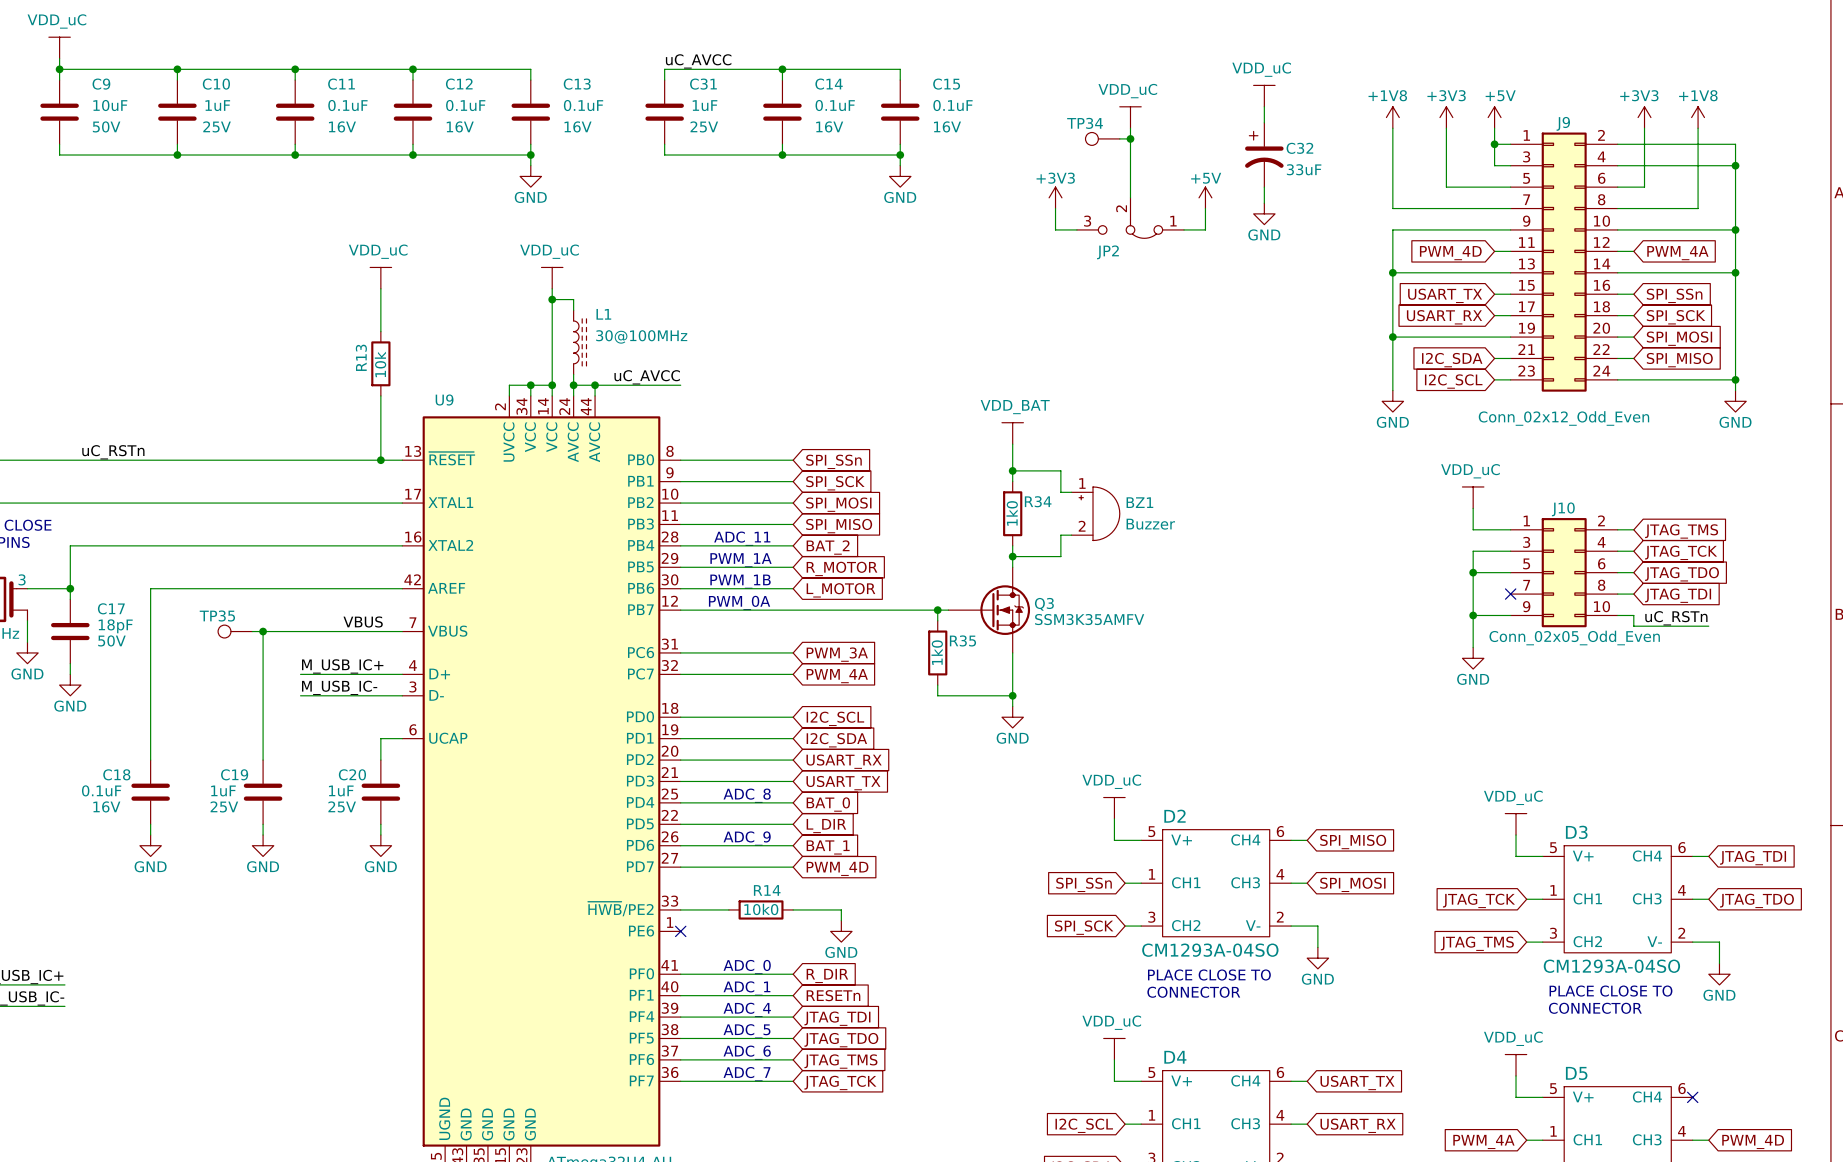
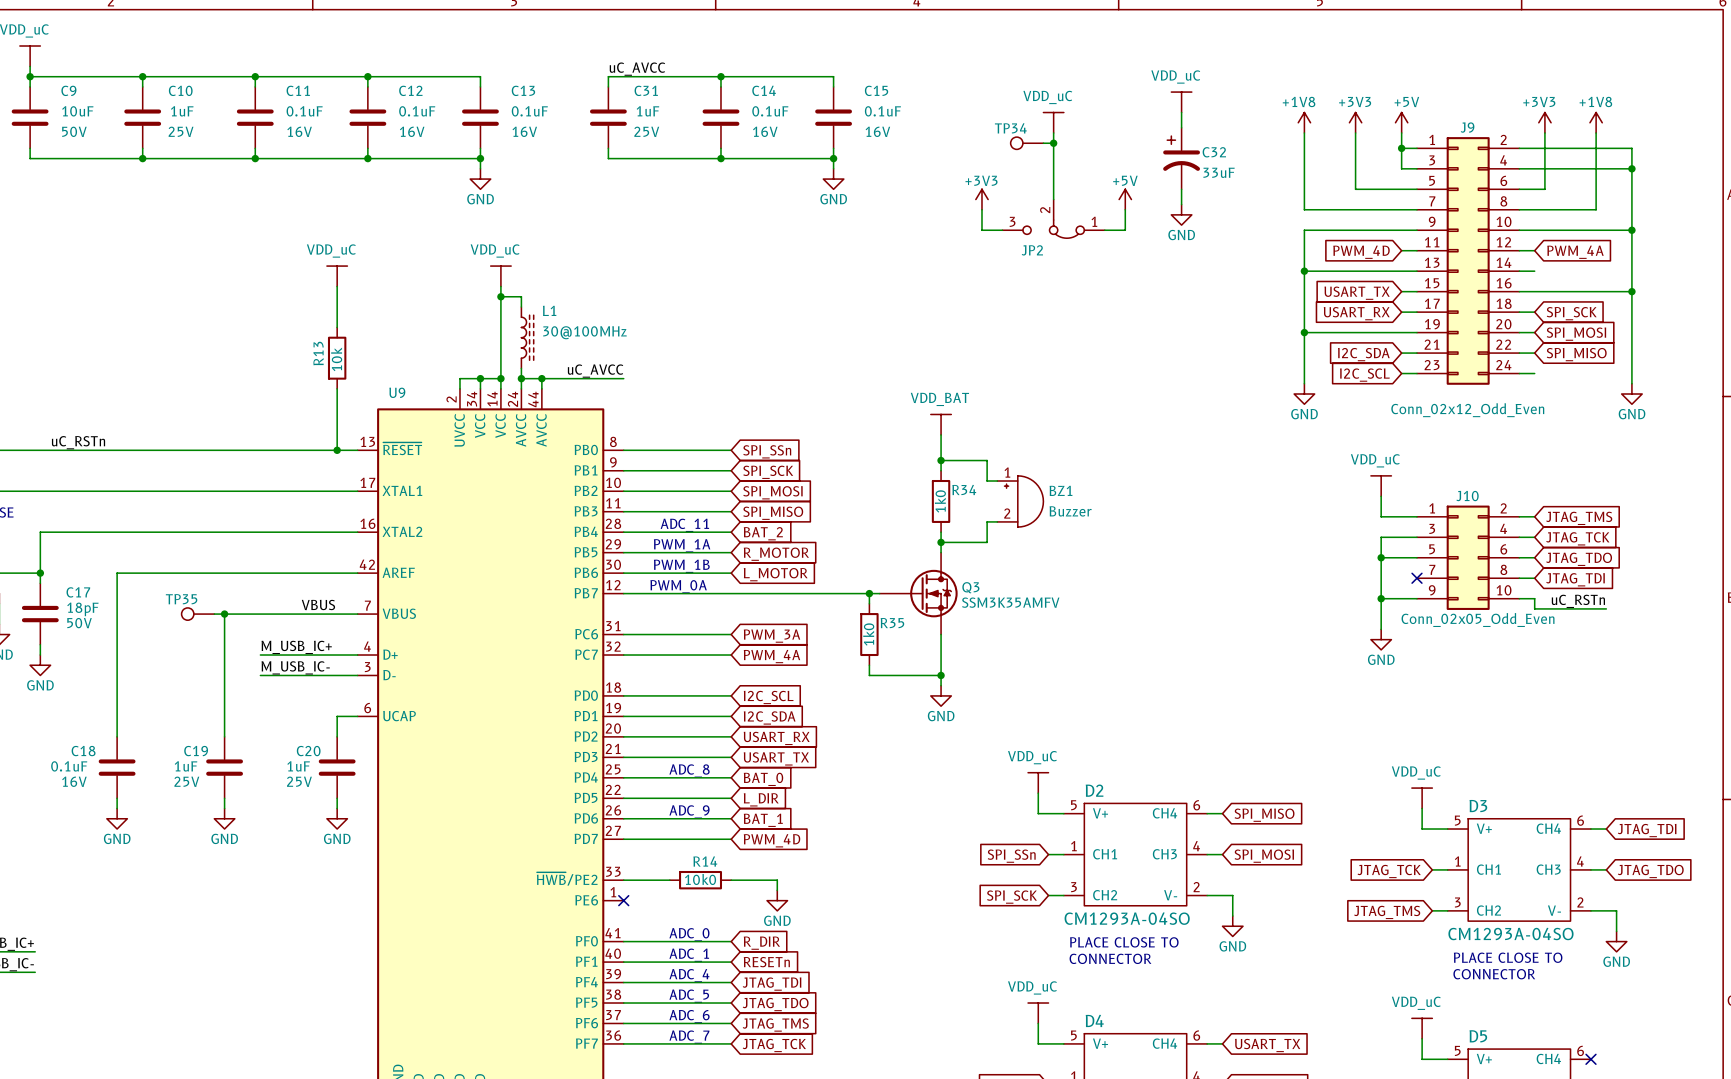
wire: (1633, 272) (1735, 272) -> (1534, 291) (1631, 291)
junction position: (1735, 272) -> (1631, 291)
global label: SPI_SSn (1674, 295) -> none
wire: (1633, 379) (1735, 379) -> none
junction: (1735, 379) -> none

